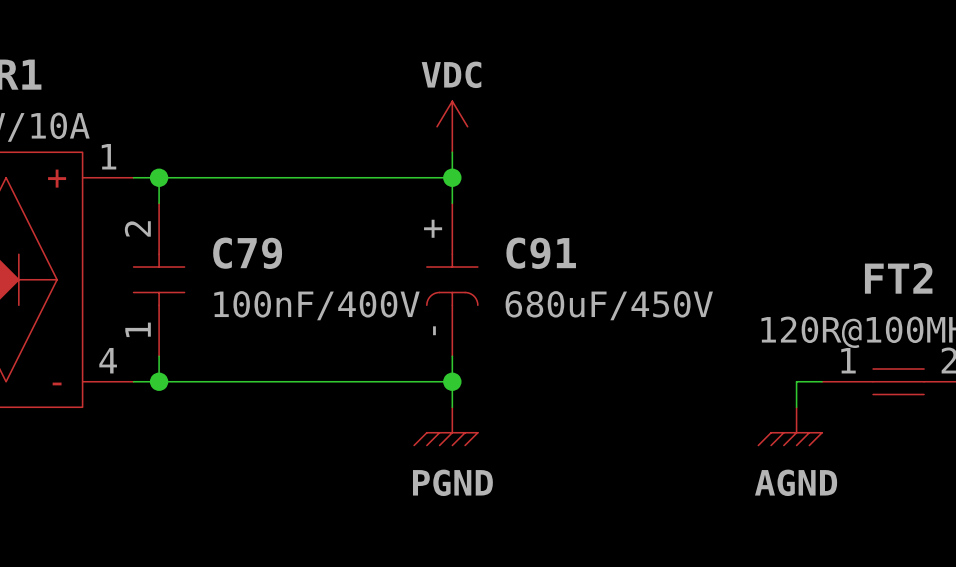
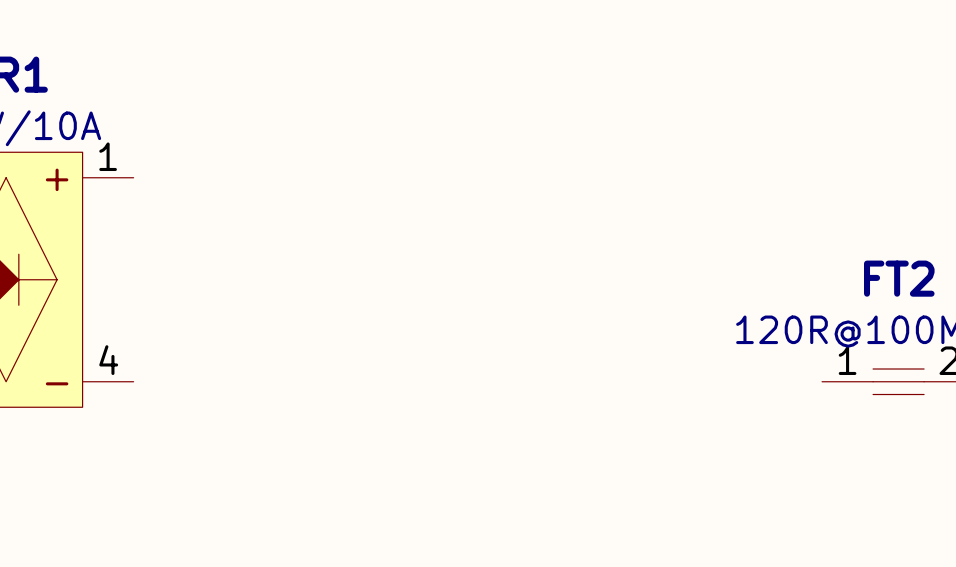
power symbol: VDC (452, 126) -> none
wire: (452, 152) (452, 203) -> none
wire: (133, 177) (452, 177) -> none
wire: (159, 177) (159, 203) -> none
junction: (159, 177) -> none
junction: (452, 177) -> none
C79: 100nF/400V (159, 279) -> none
C91: 680uF/450V (452, 279) -> none
wire: (159, 356) (159, 381) -> none
wire: (452, 356) (452, 407) -> none
wire: (133, 381) (452, 381) -> none
junction: (159, 381) -> none
junction: (452, 381) -> none
wire: (822, 381) (796, 381) (796, 407) -> none
power symbol: PGND (445, 426) -> none
power symbol: AGND (790, 426) -> none

